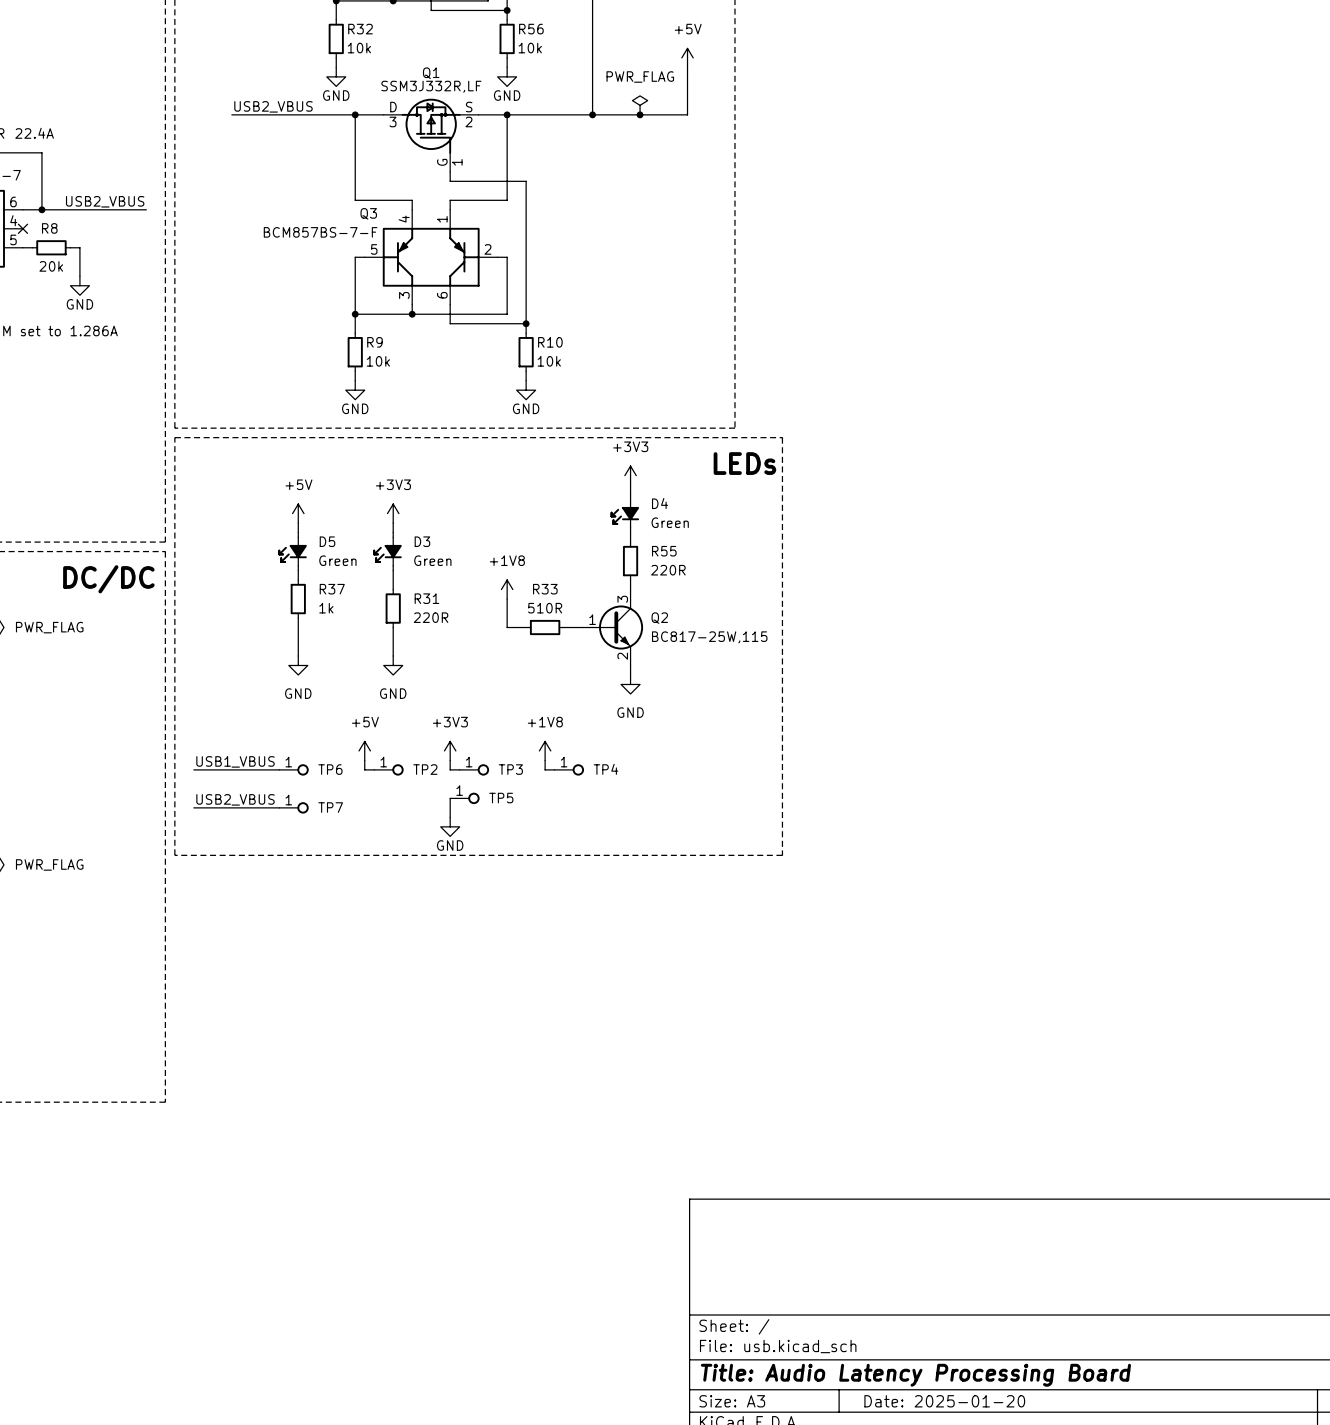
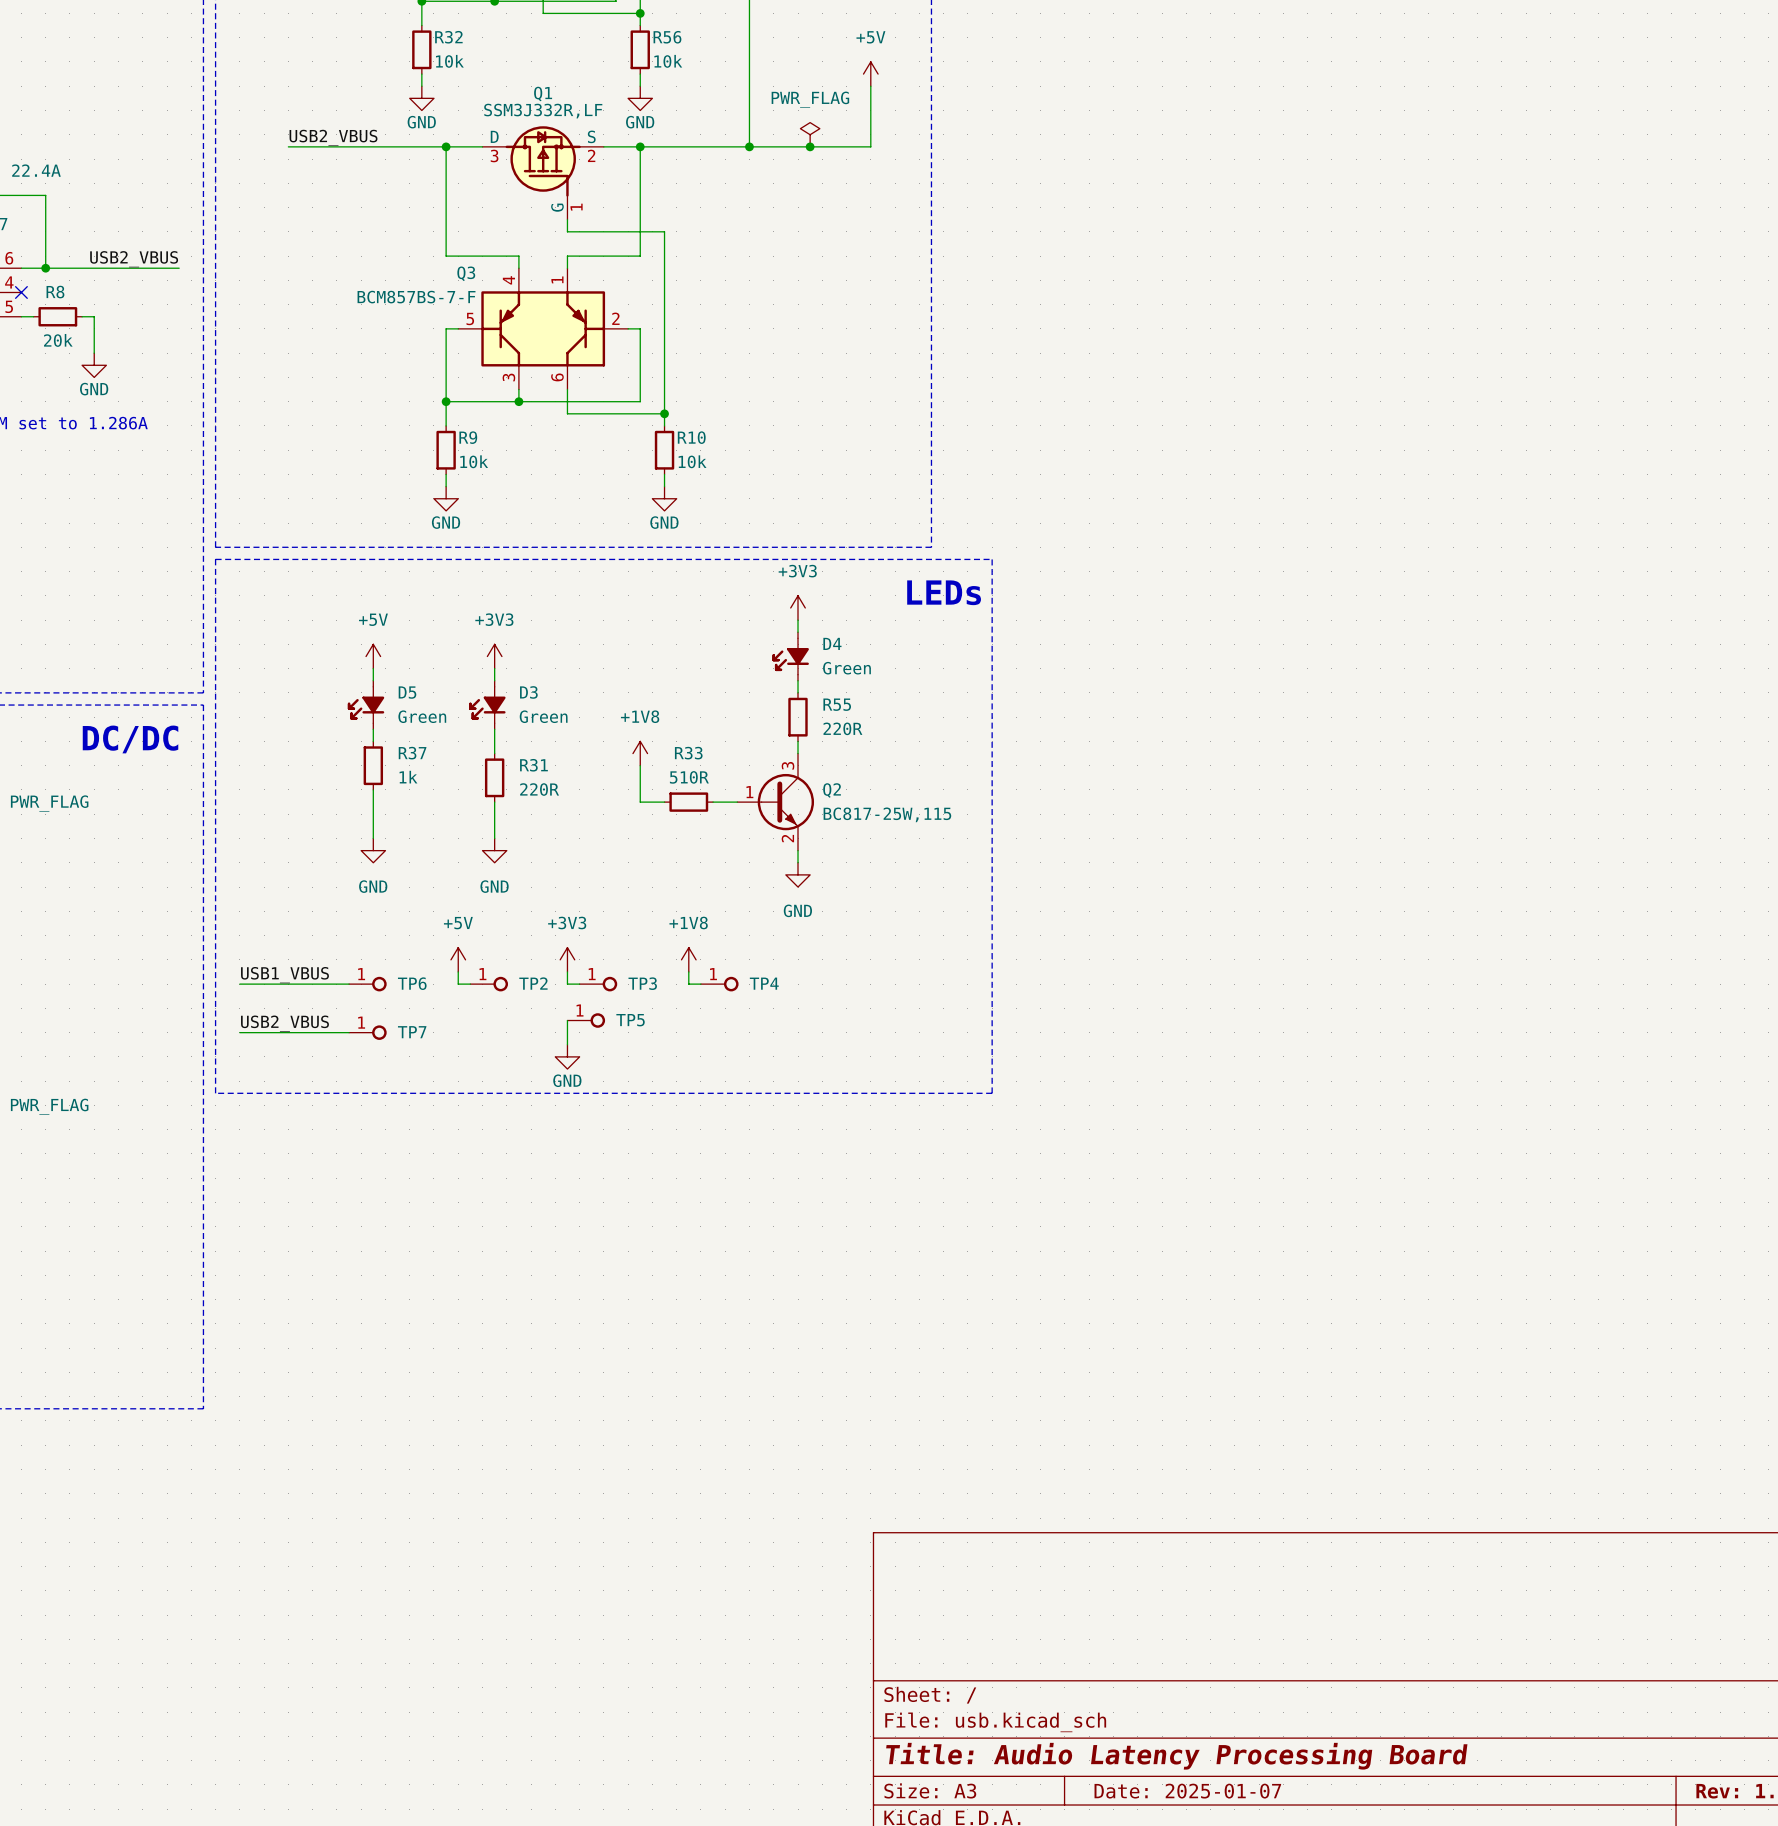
title block: Date: 2025-01-20 (944, 1401) -> Date: 2025-01-07 (1187, 1791)

